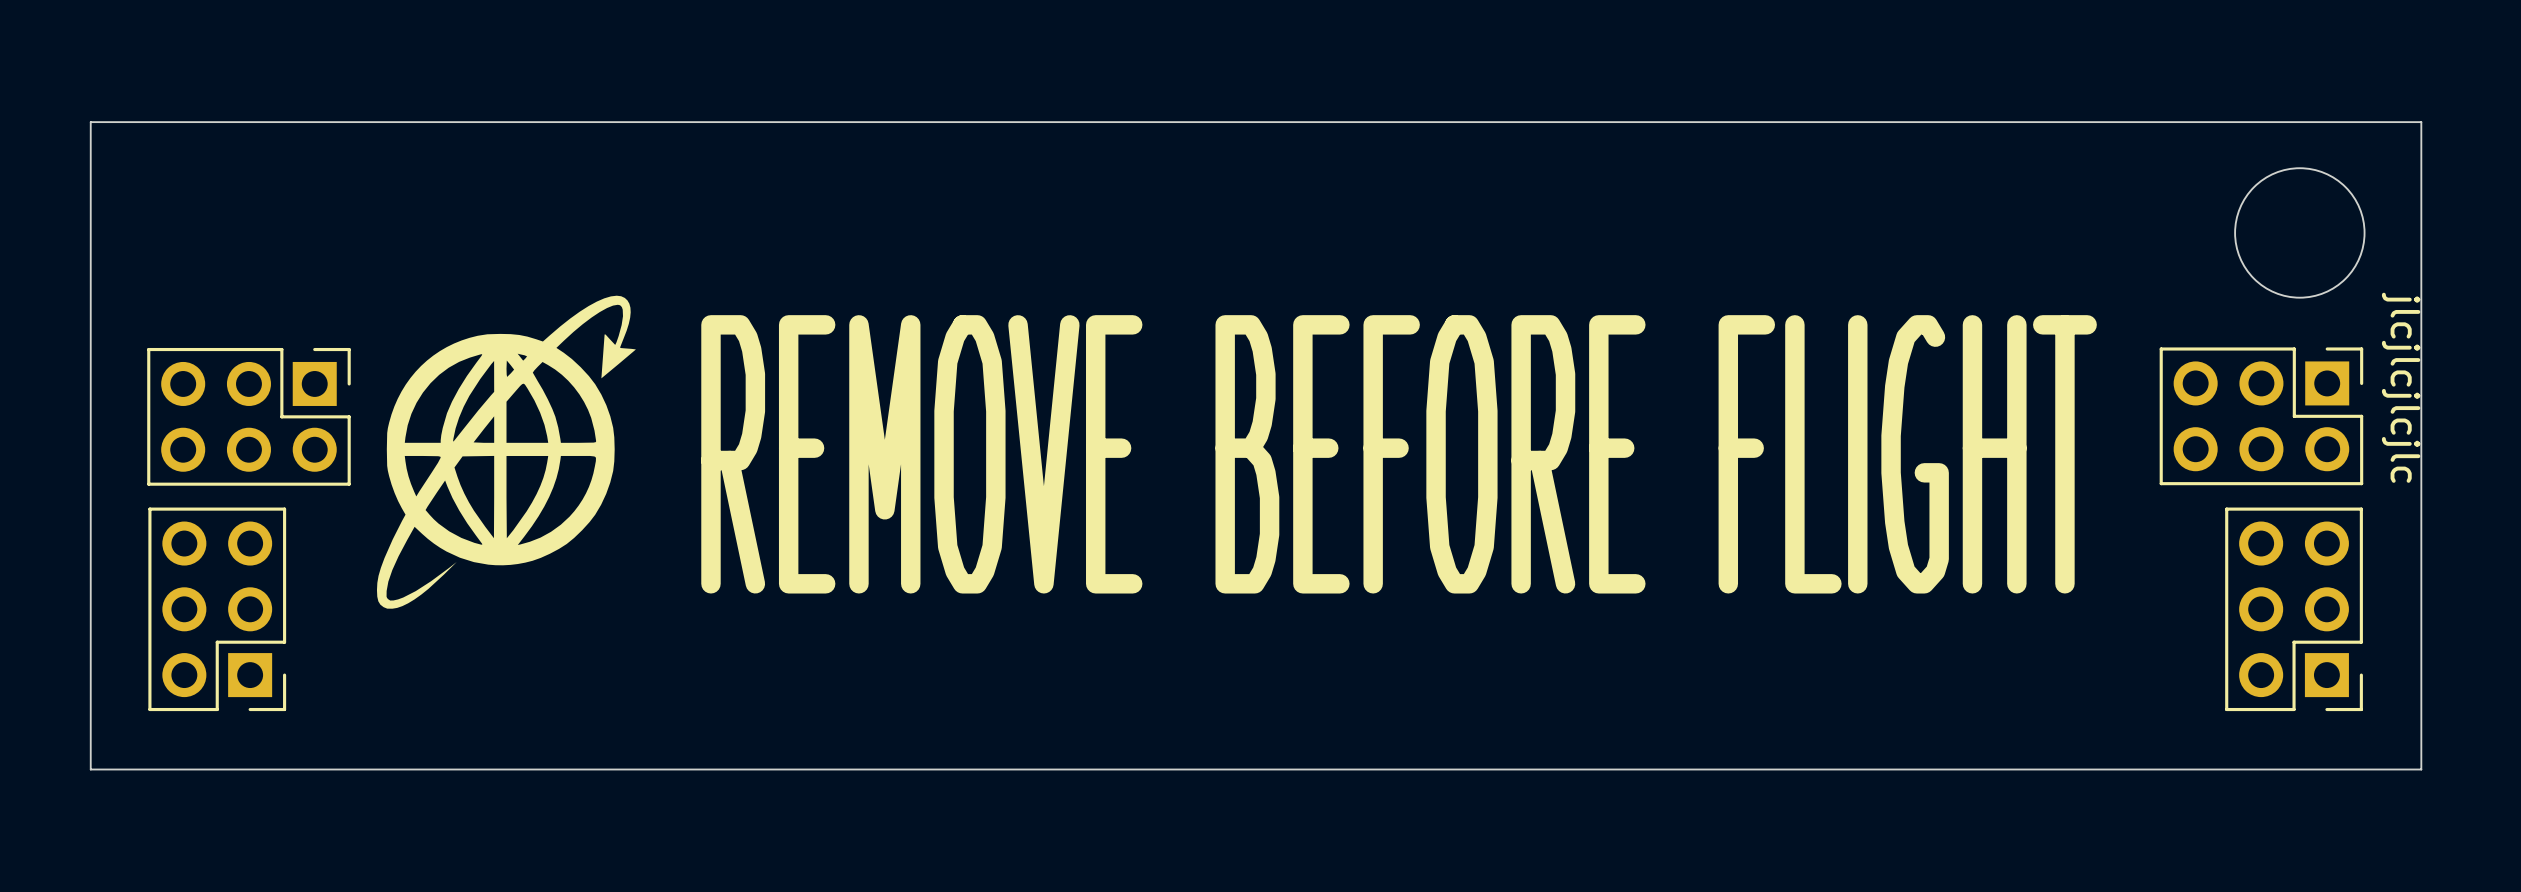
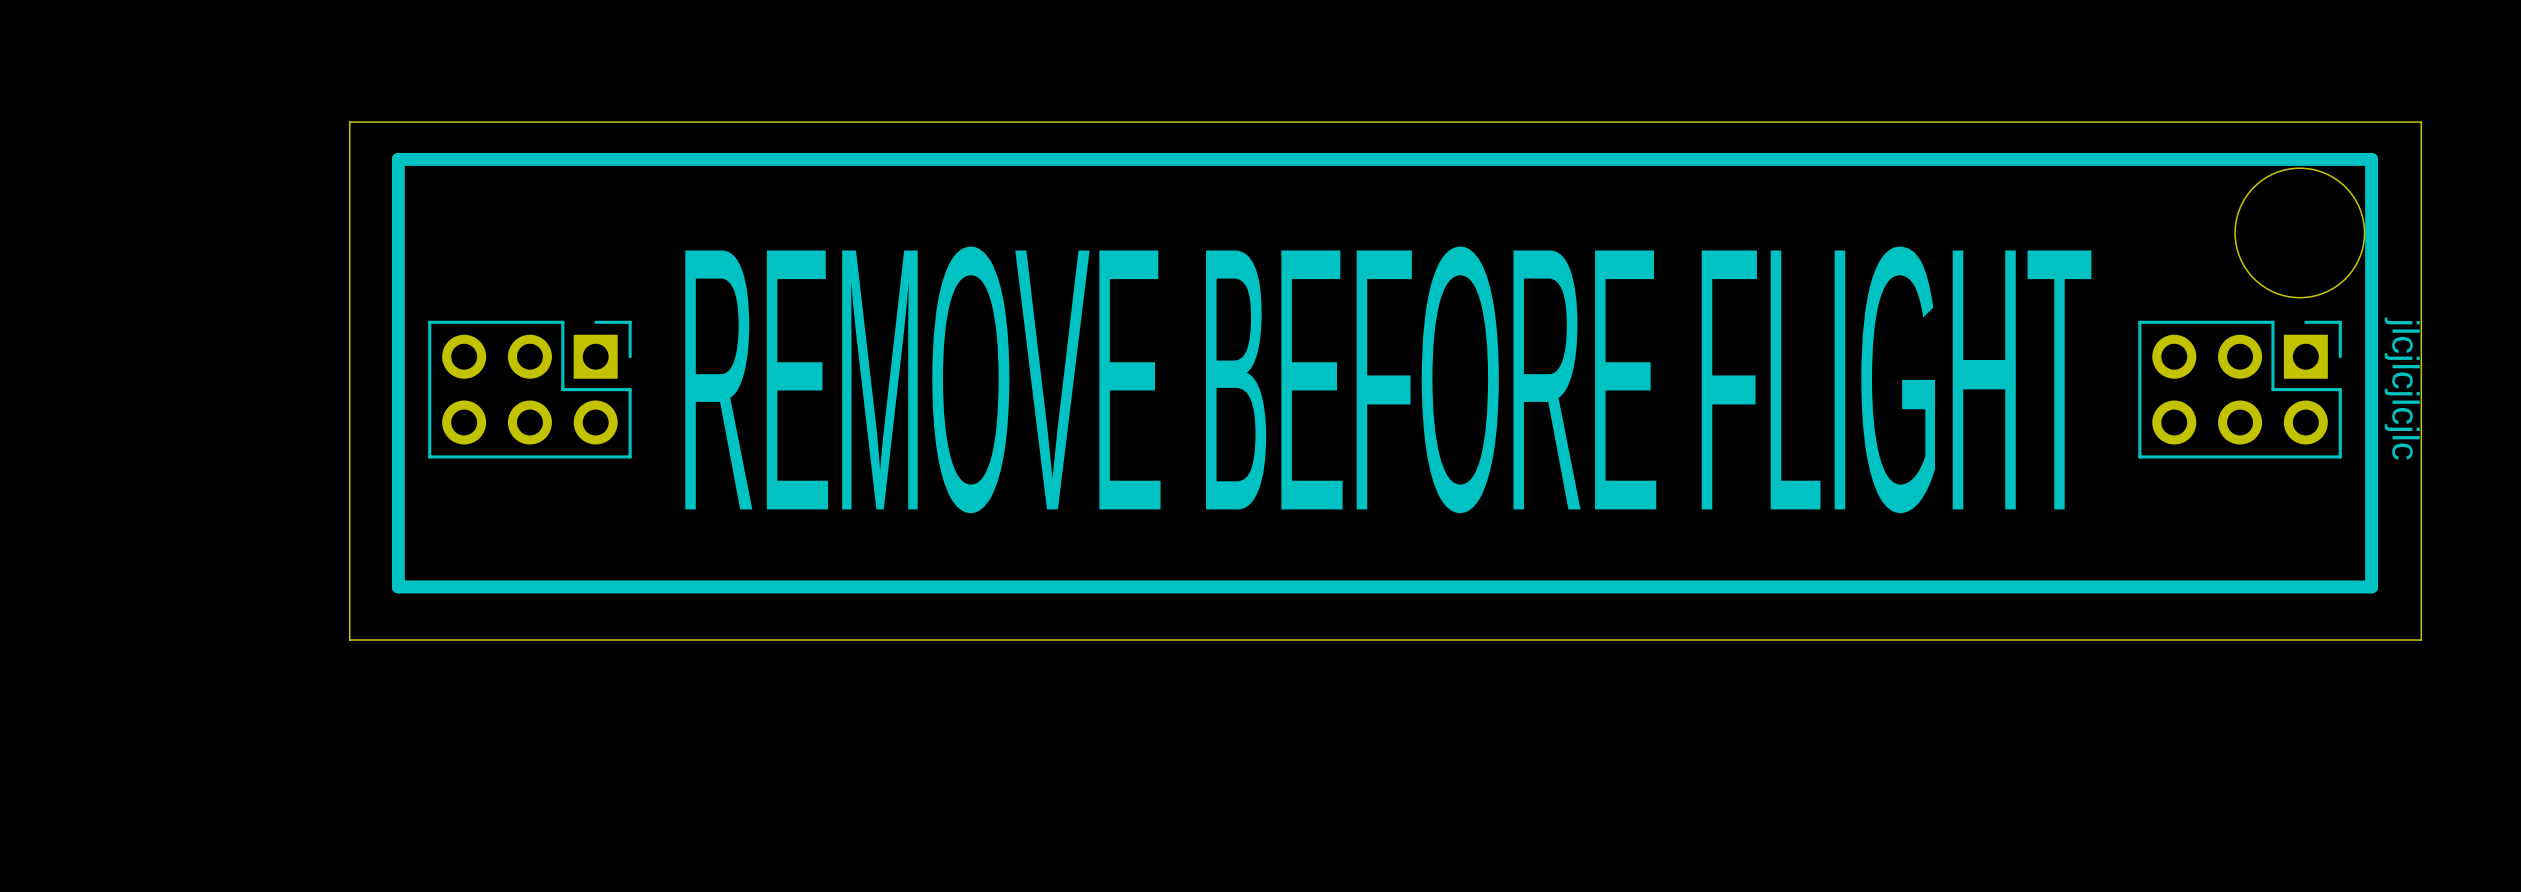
board edge: (349, 122) (90, 122) (90, 769) (2421, 769) (2421, 640) -> (349, 122) (349, 640) (2421, 640)
line: none -> (2371, 159) (398, 159) (398, 586) (2371, 586) (2371, 159)
drawing: [376, 295, 636, 609] -> none
part: none -> (529, 389)
part: (248, 416) -> none
part position: (2261, 416) -> (2240, 389)
text position: REMOVE BEFORE FLIGHT (1399, 454) -> REMOVE BEFORE FLIGHT (1388, 379)
part: (217, 609) -> none
part: (2294, 609) -> none

